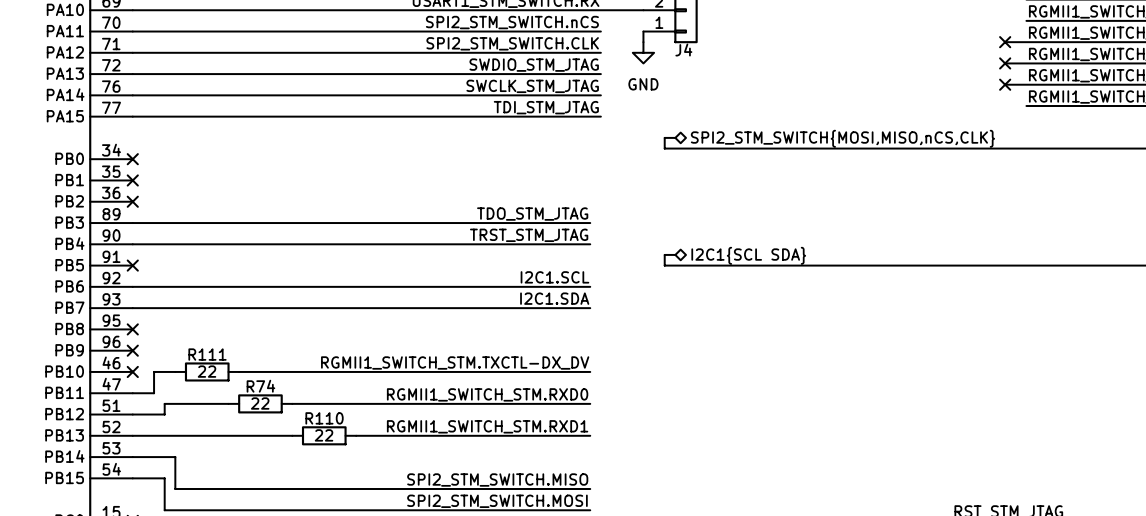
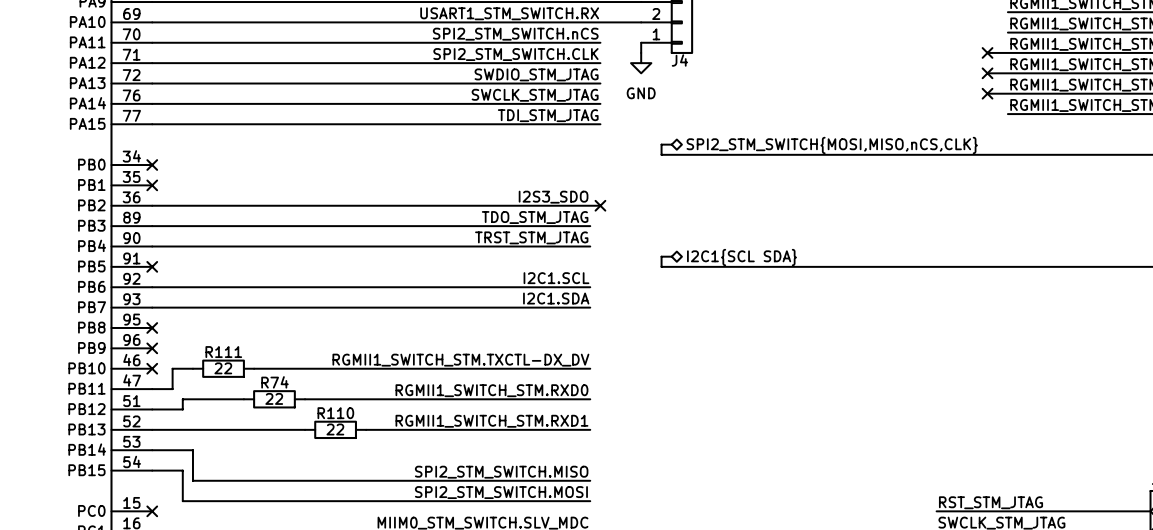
label: none -> I2S3_SDO (553, 197)
wire: none -> (152, 205) (600, 205)
no-connect mark: (132, 201) -> none
no-connect mark: none -> (600, 205)

